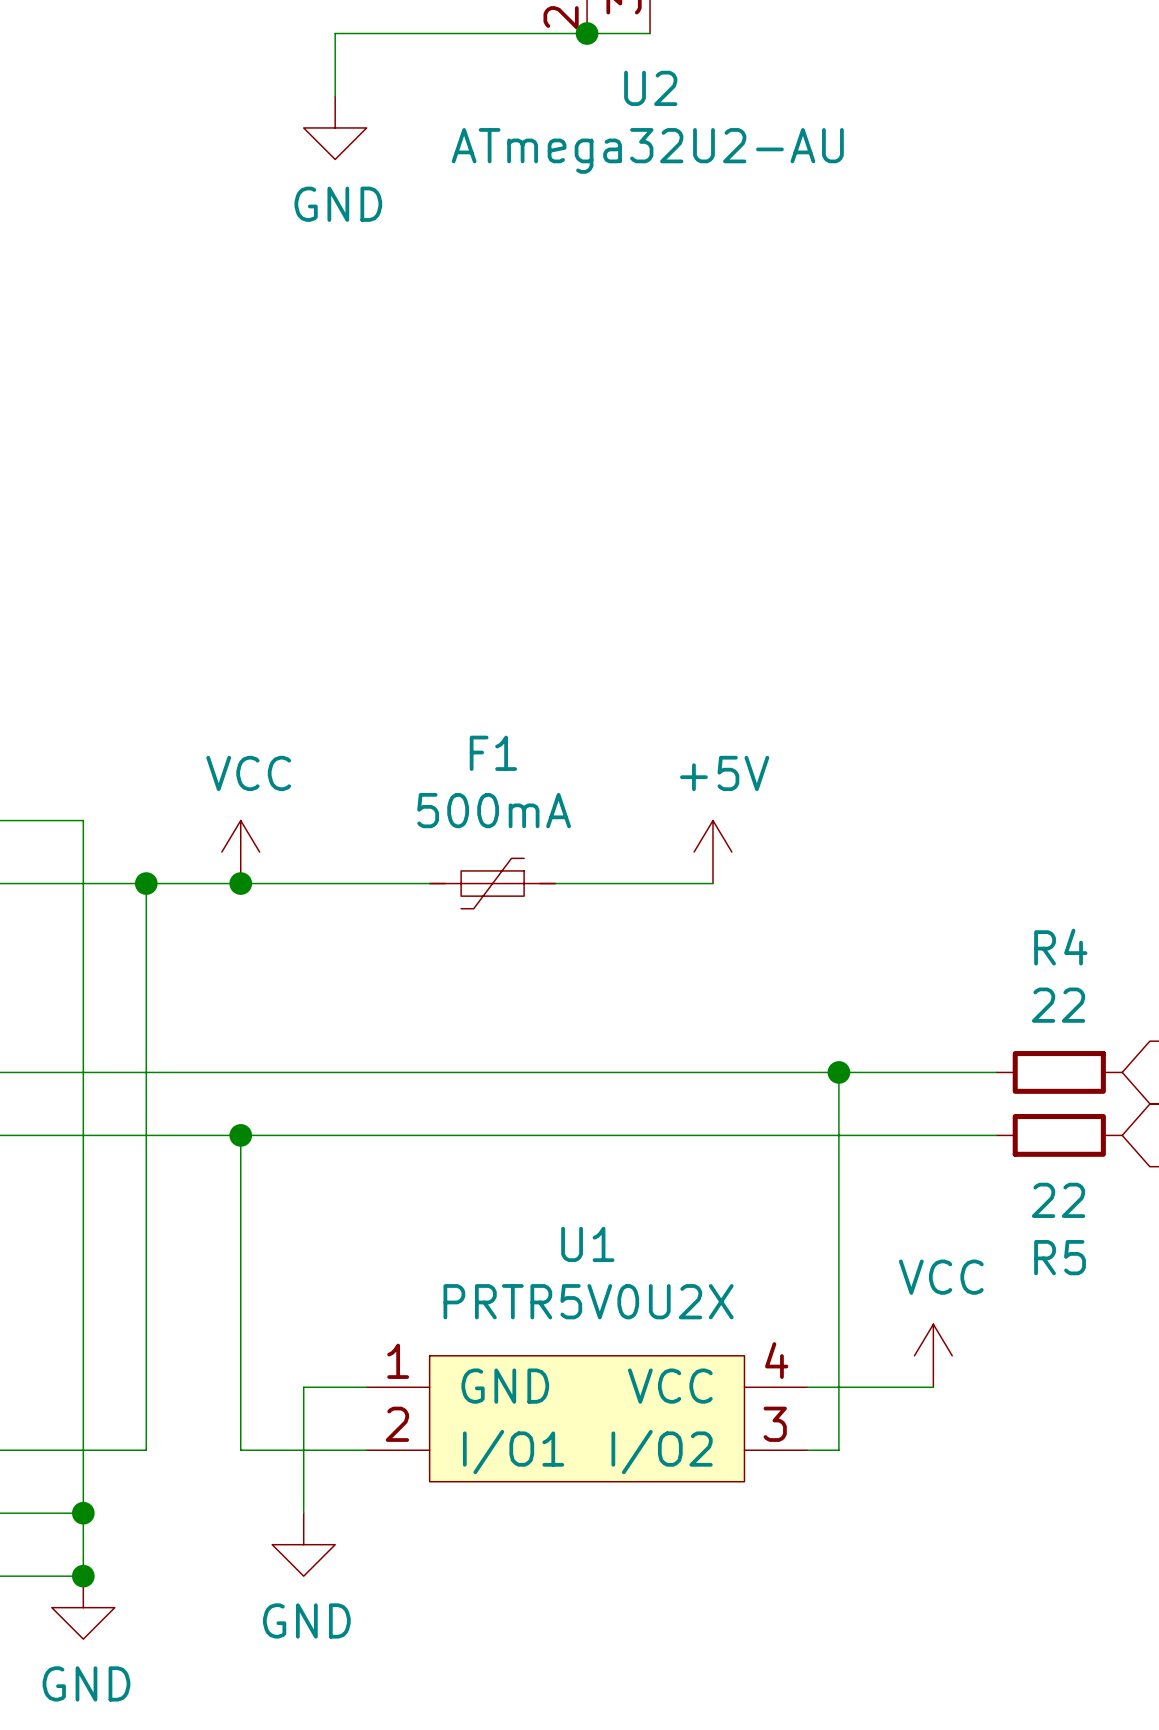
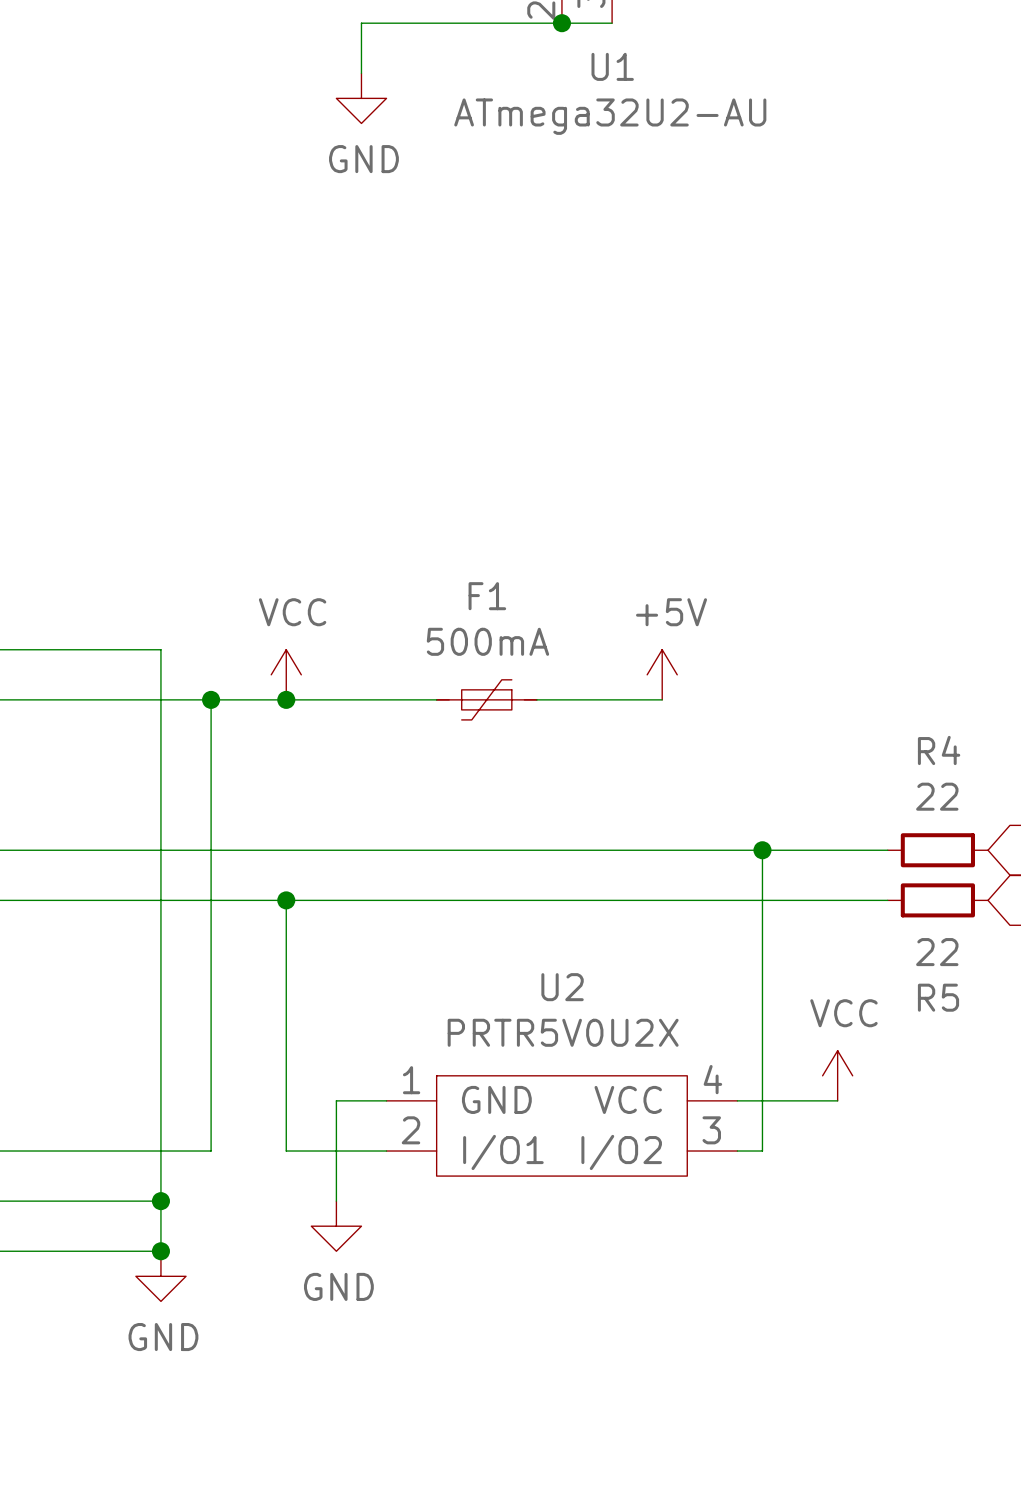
U2 name: U2 (650, 88) -> U1 (612, 66)
U1 name: U1 (587, 1244) -> U2 (562, 987)

